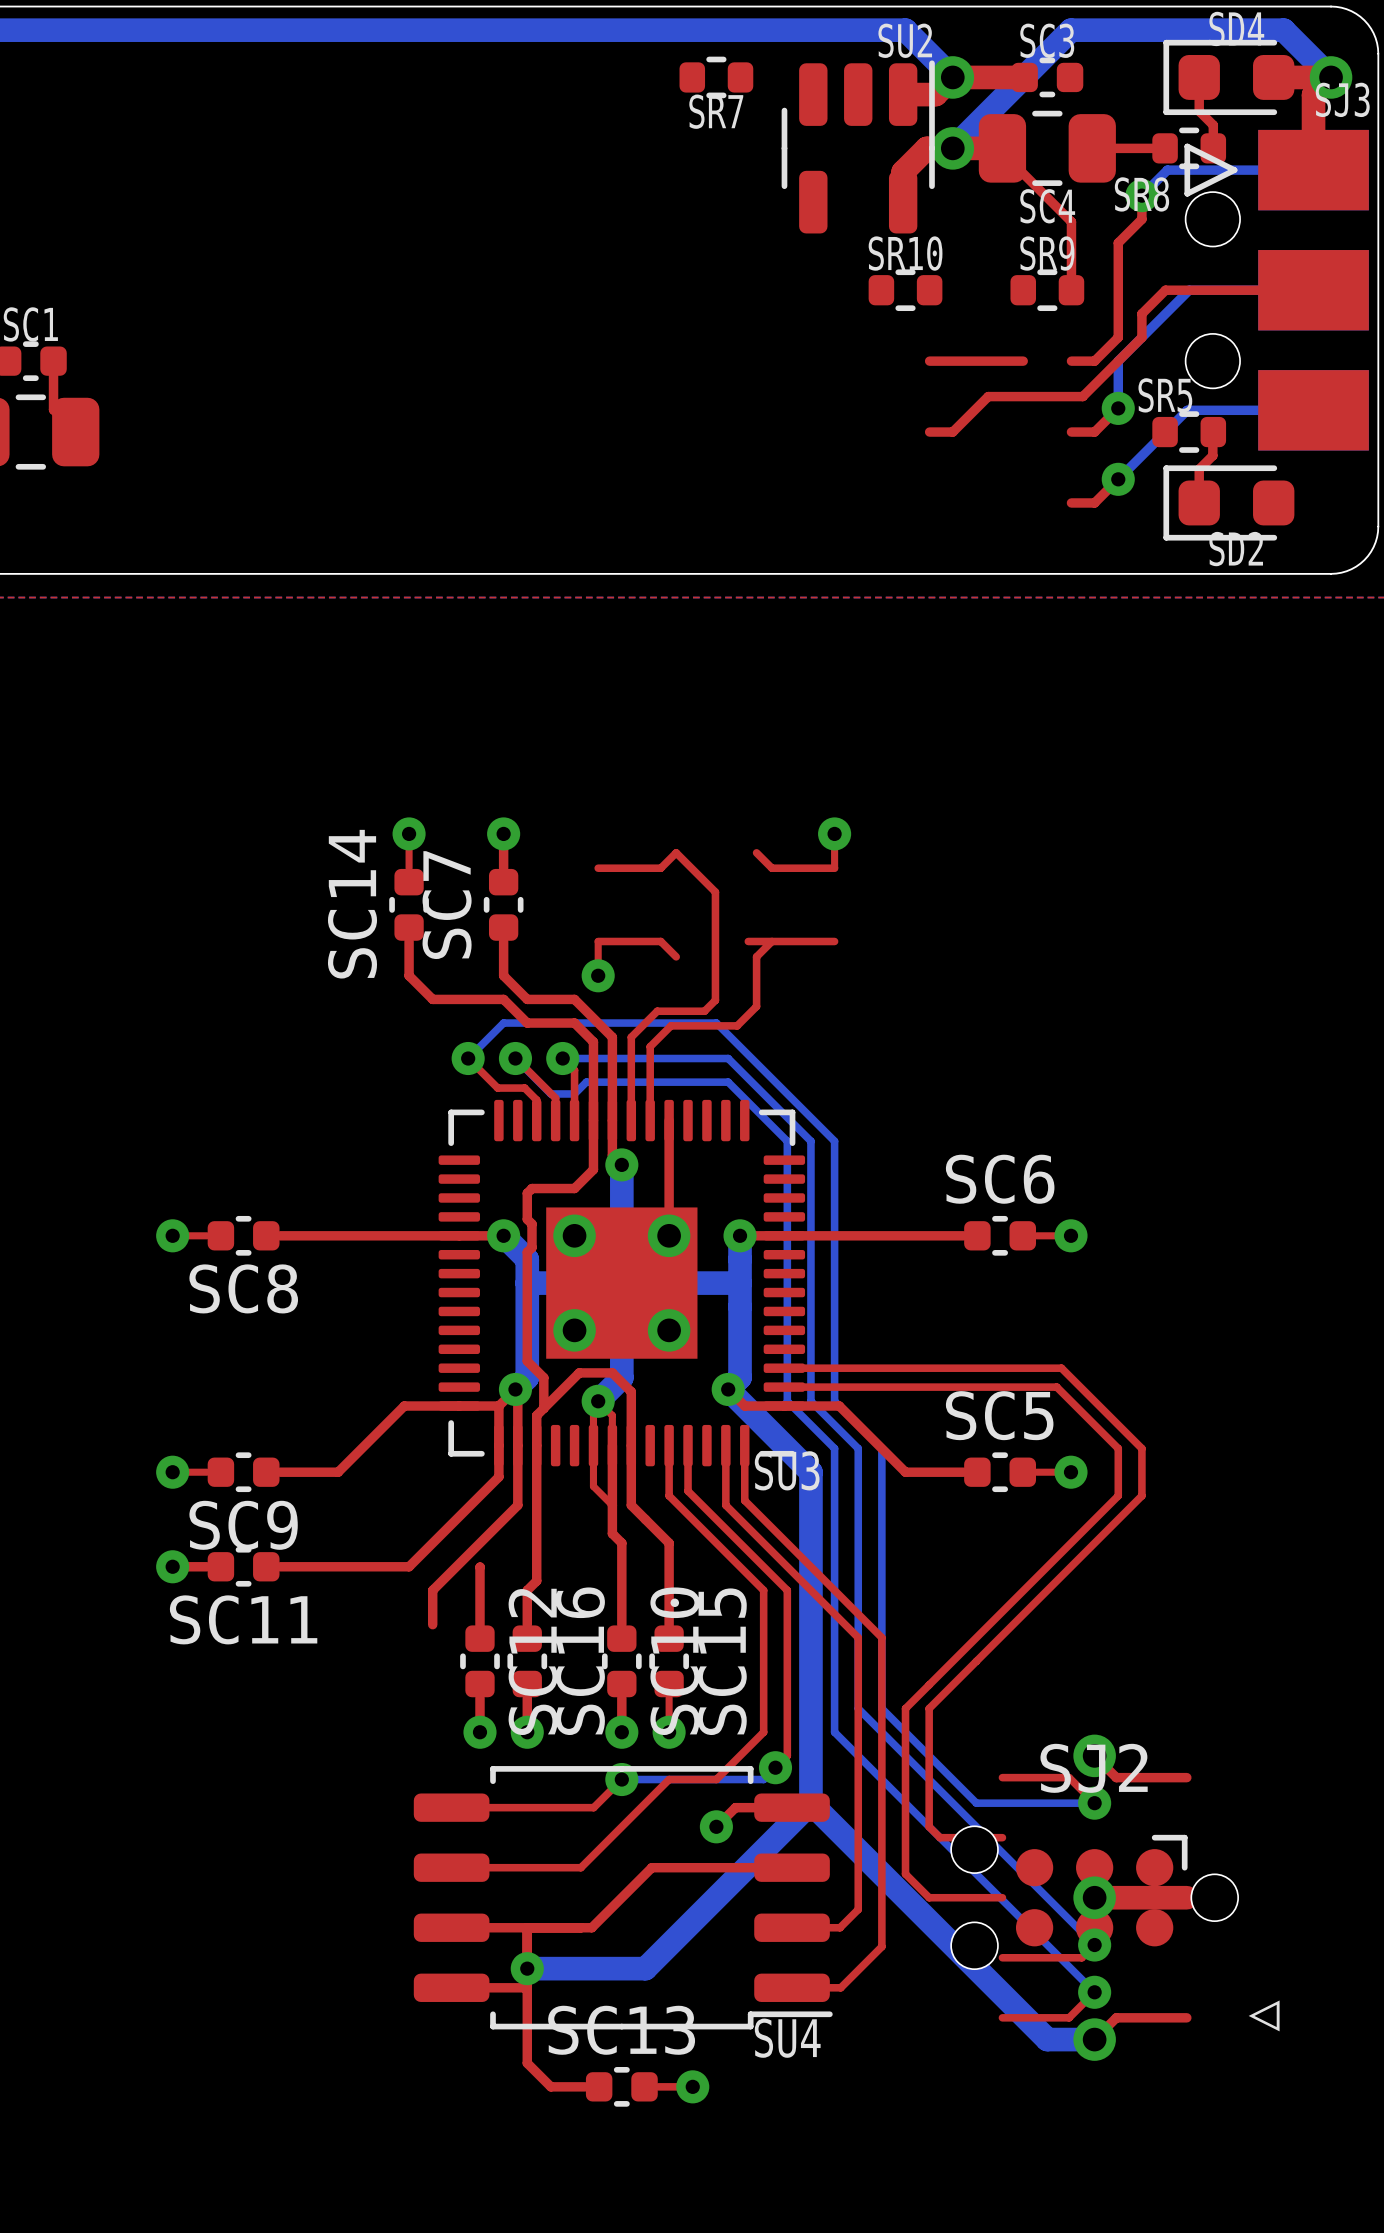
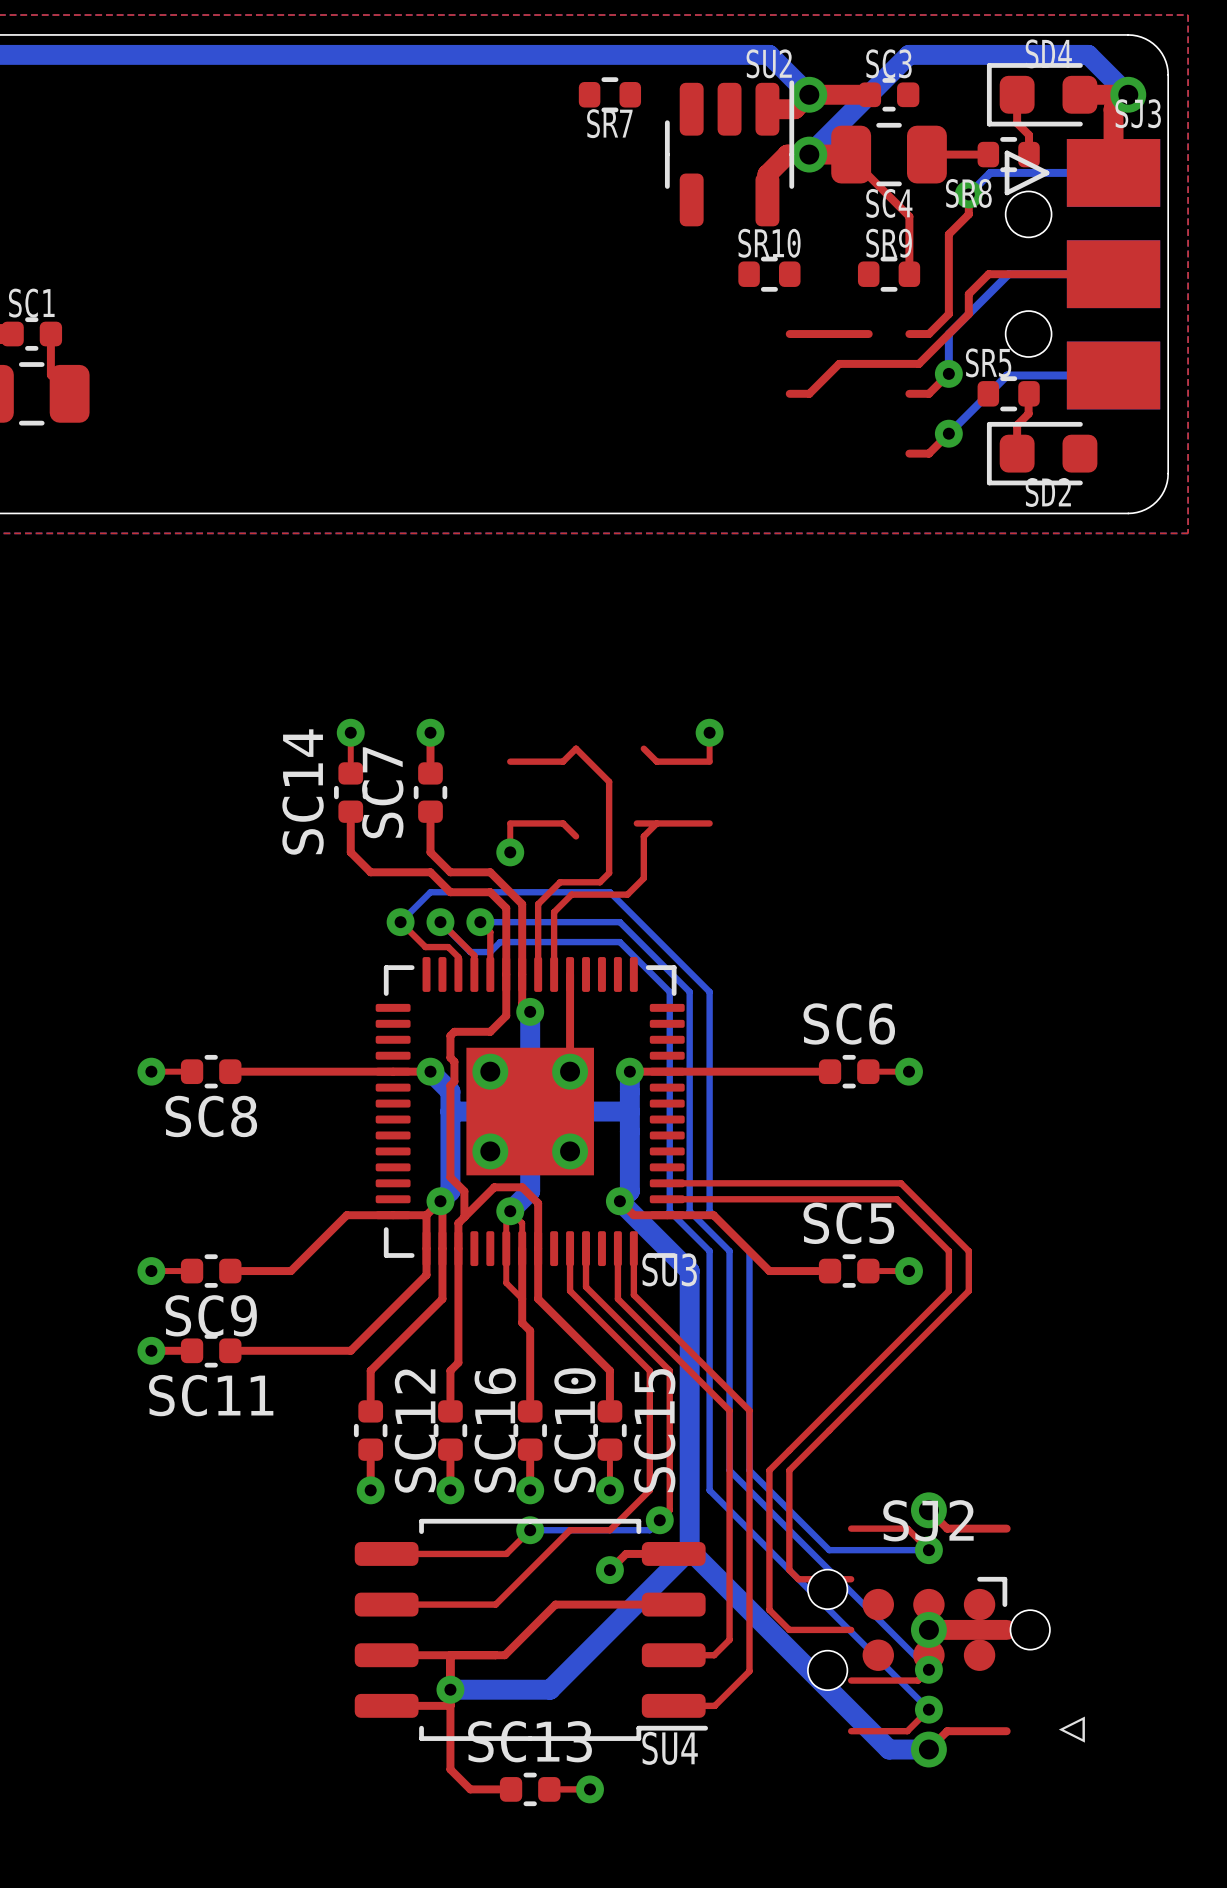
top track: (669, 1543) (669, 1638) -> (570, 1330) (609, 1370) (609, 1399)
top track: (479, 1567) (479, 1638) -> none
SC12 position: (479, 1661) -> (370, 1430)
SC15 position: (669, 1661) -> (609, 1430)
top track: (479, 1697) (479, 1732) -> (370, 1461) (370, 1490)
top track: (669, 1697) (669, 1732) -> (609, 1461) (609, 1490)
via position: (479, 1732) -> (370, 1490)
via position: (669, 1732) -> (609, 1490)

